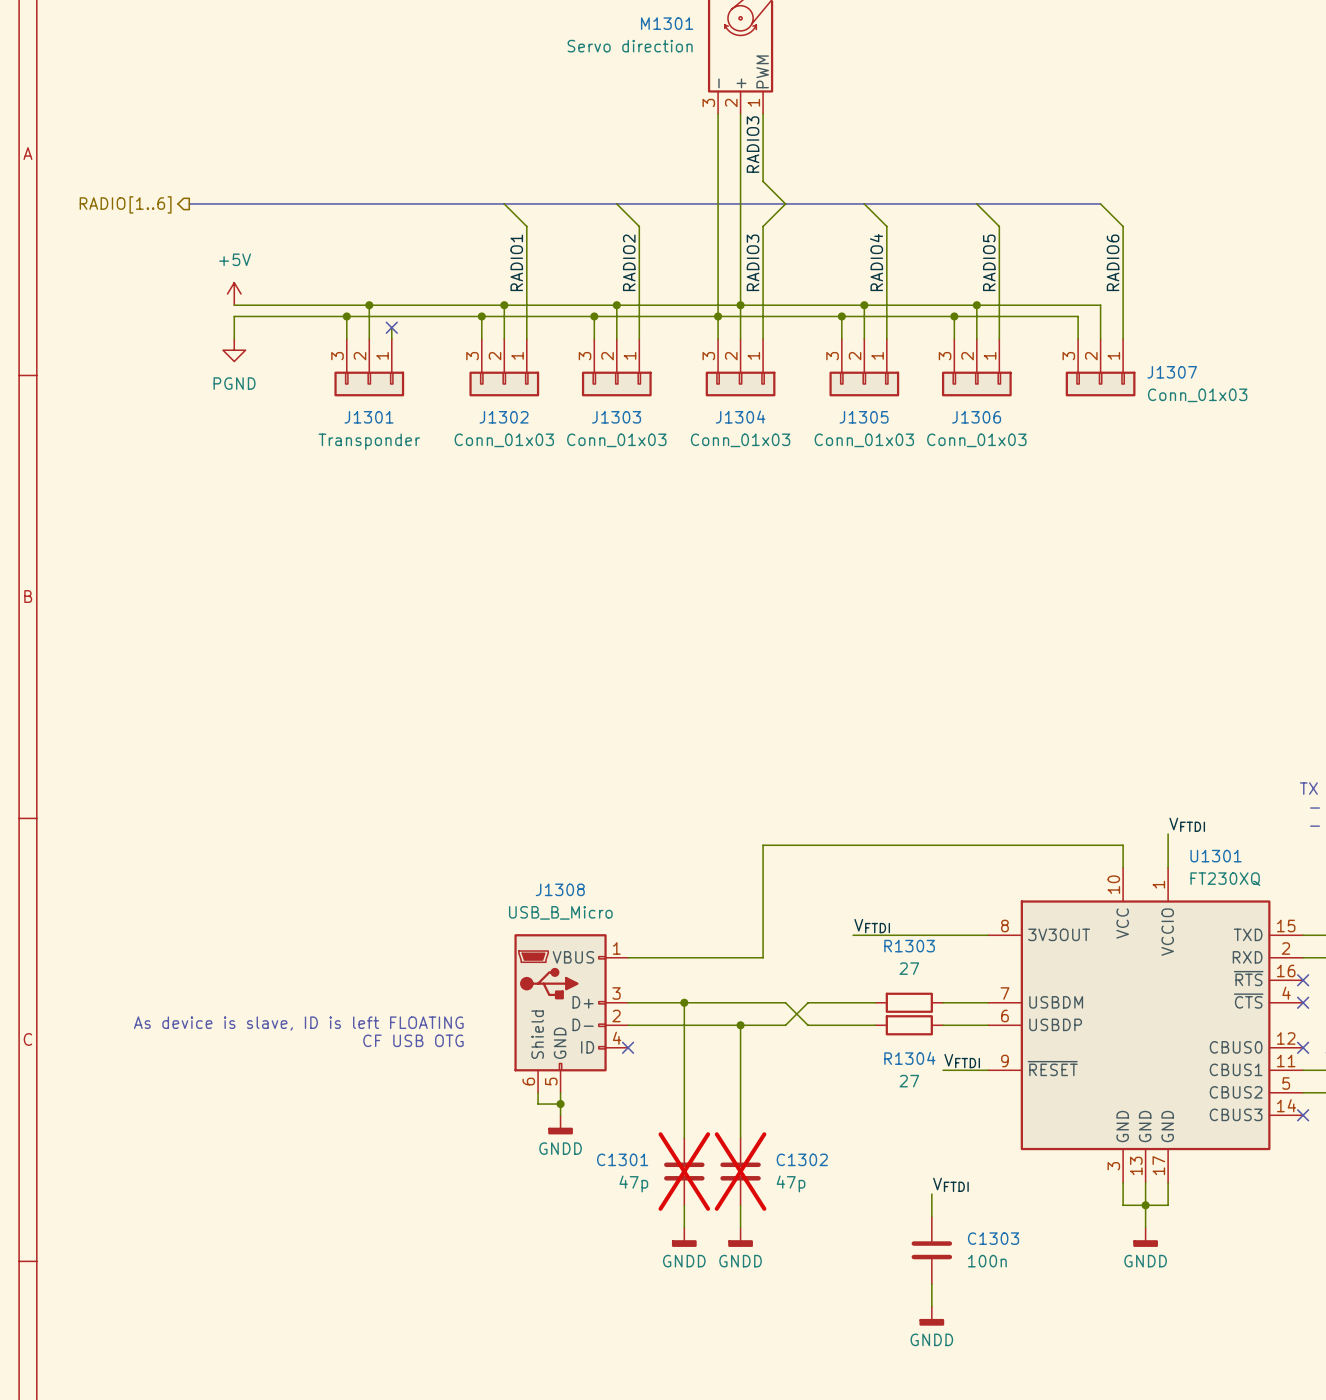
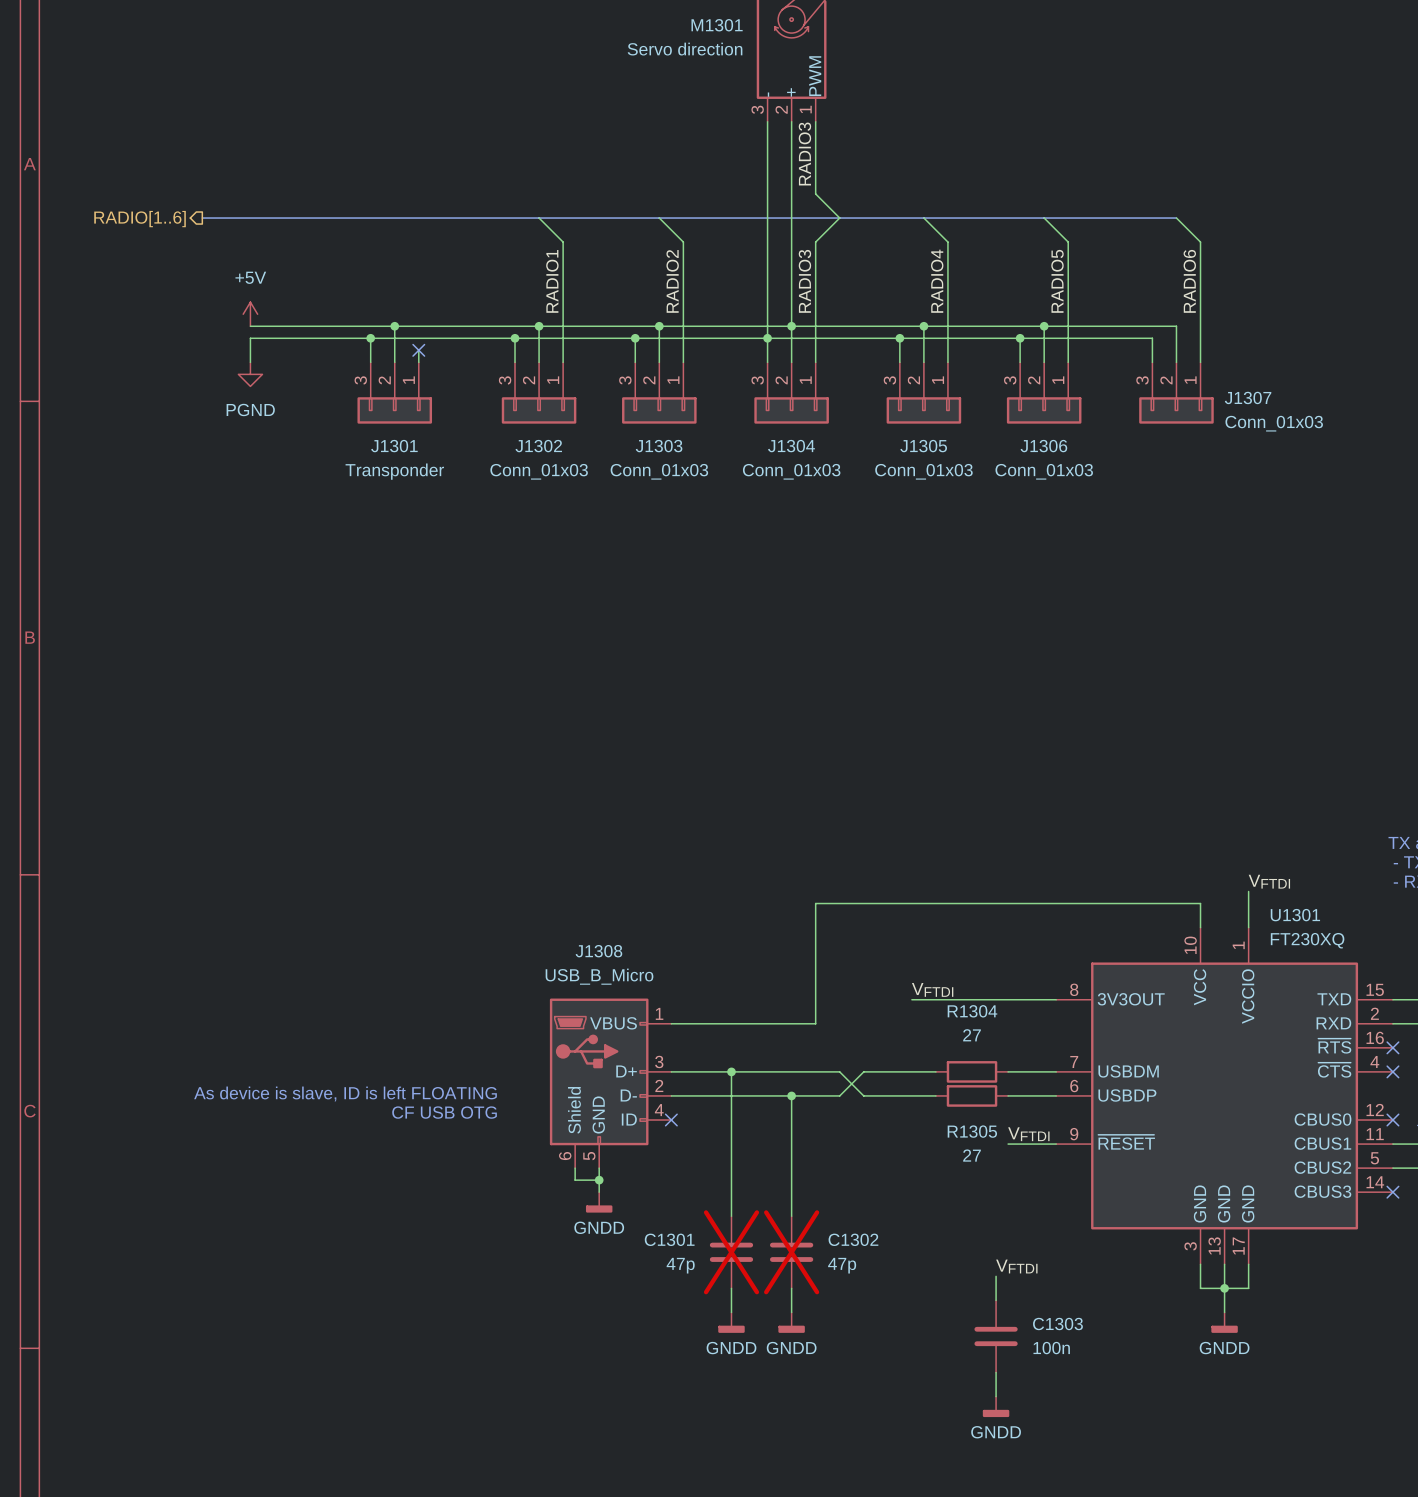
R1303 name: R1303 (909, 946) -> R1304 (972, 1011)
R1304 name: R1304 (909, 1058) -> R1305 (972, 1131)

